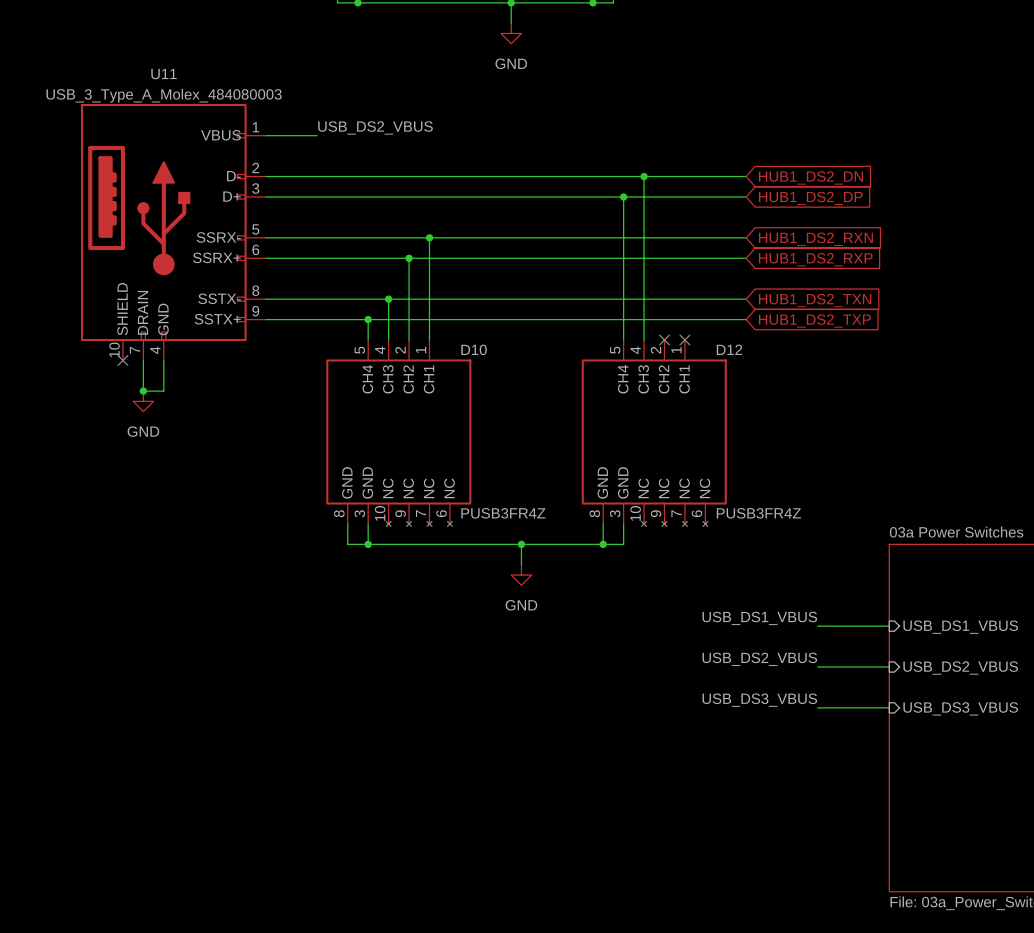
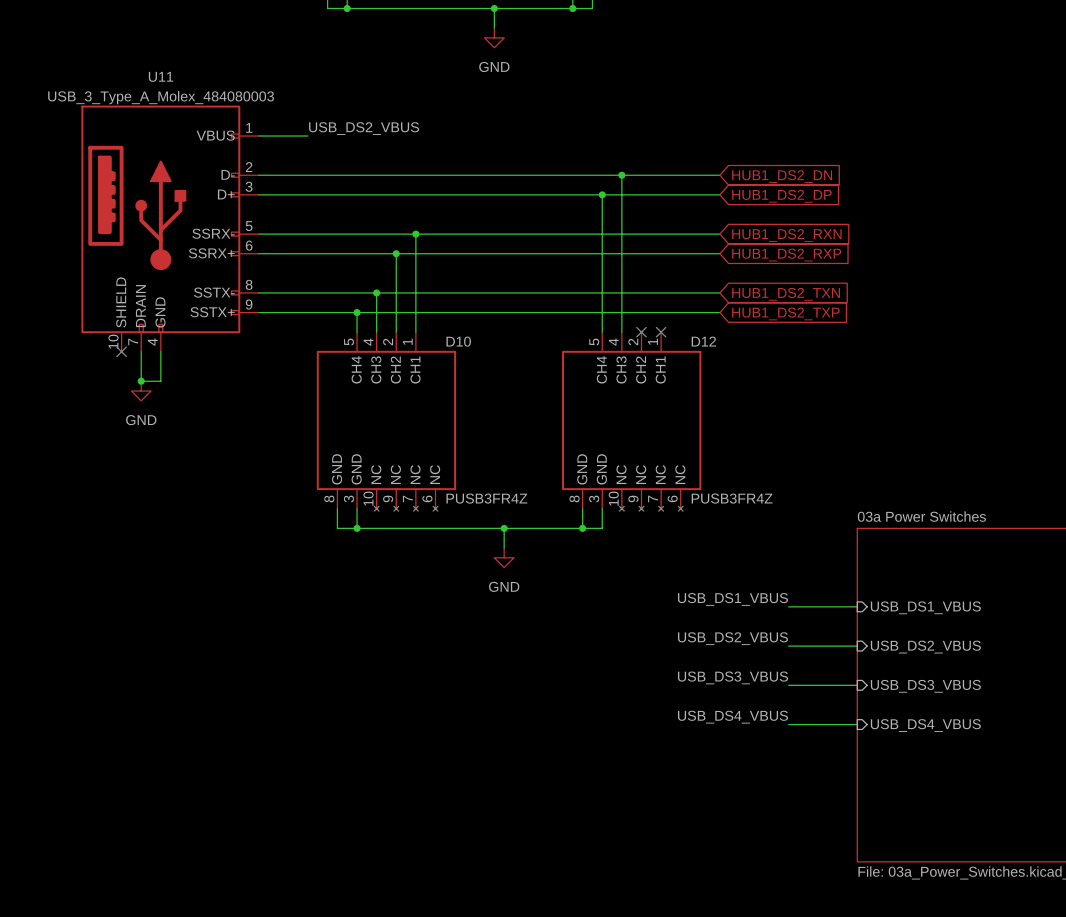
label: none -> USB_DS4_VBUS (732, 717)
wire: none -> (788, 724) (857, 724)
sheet pin: none -> USB_DS4_VBUS (925, 725)

